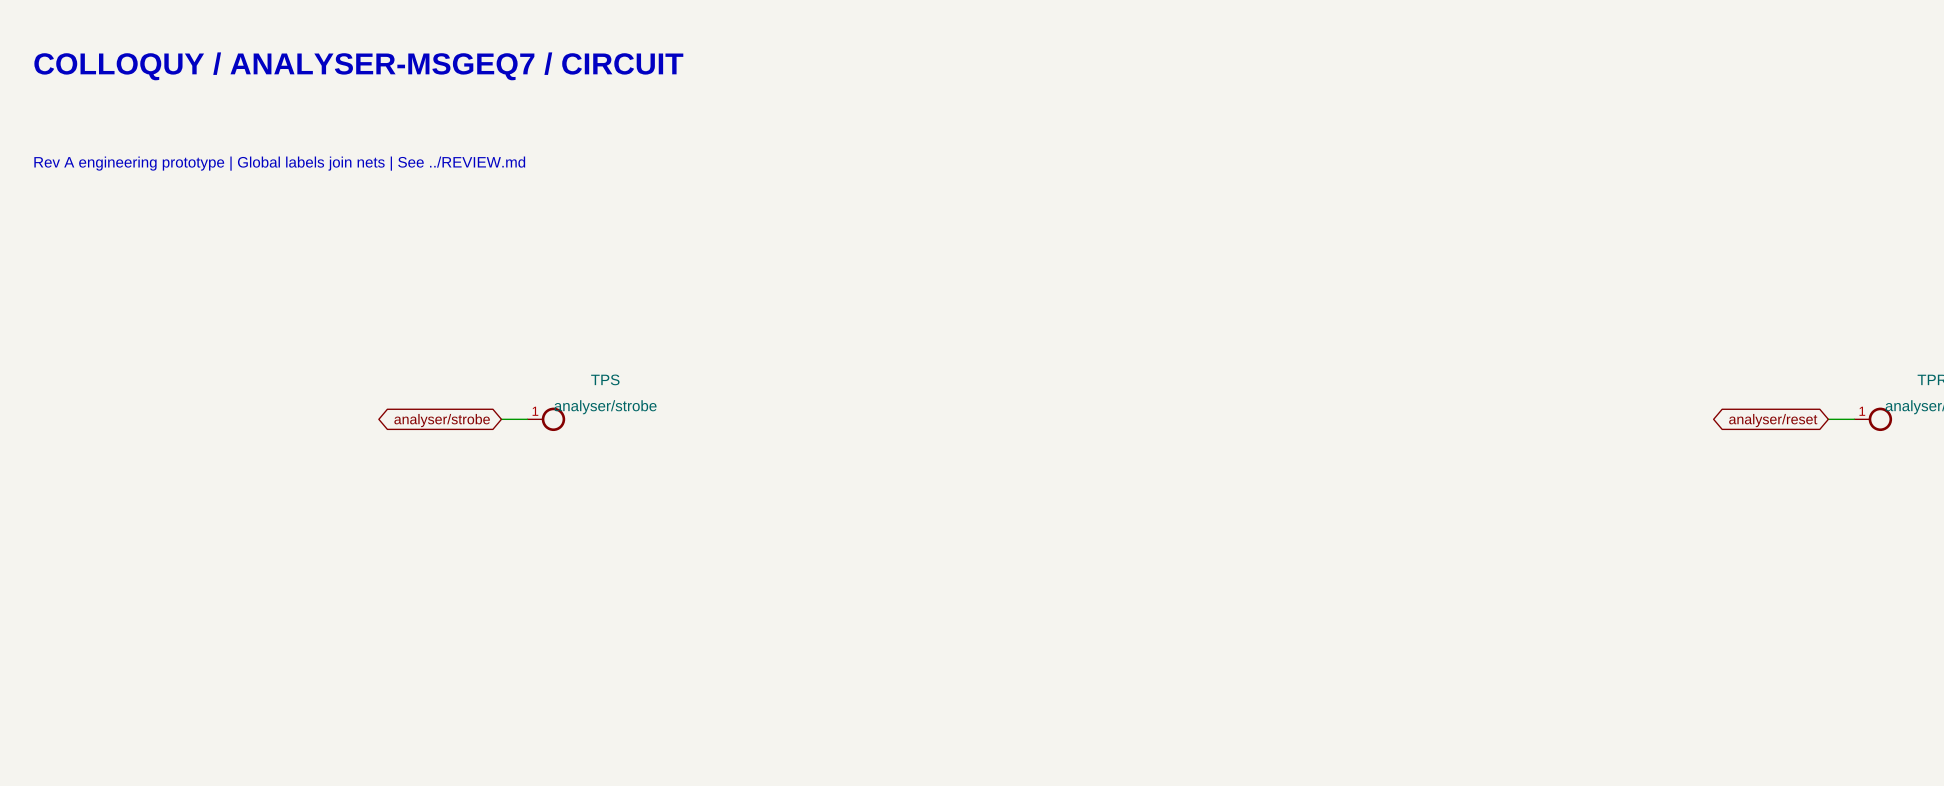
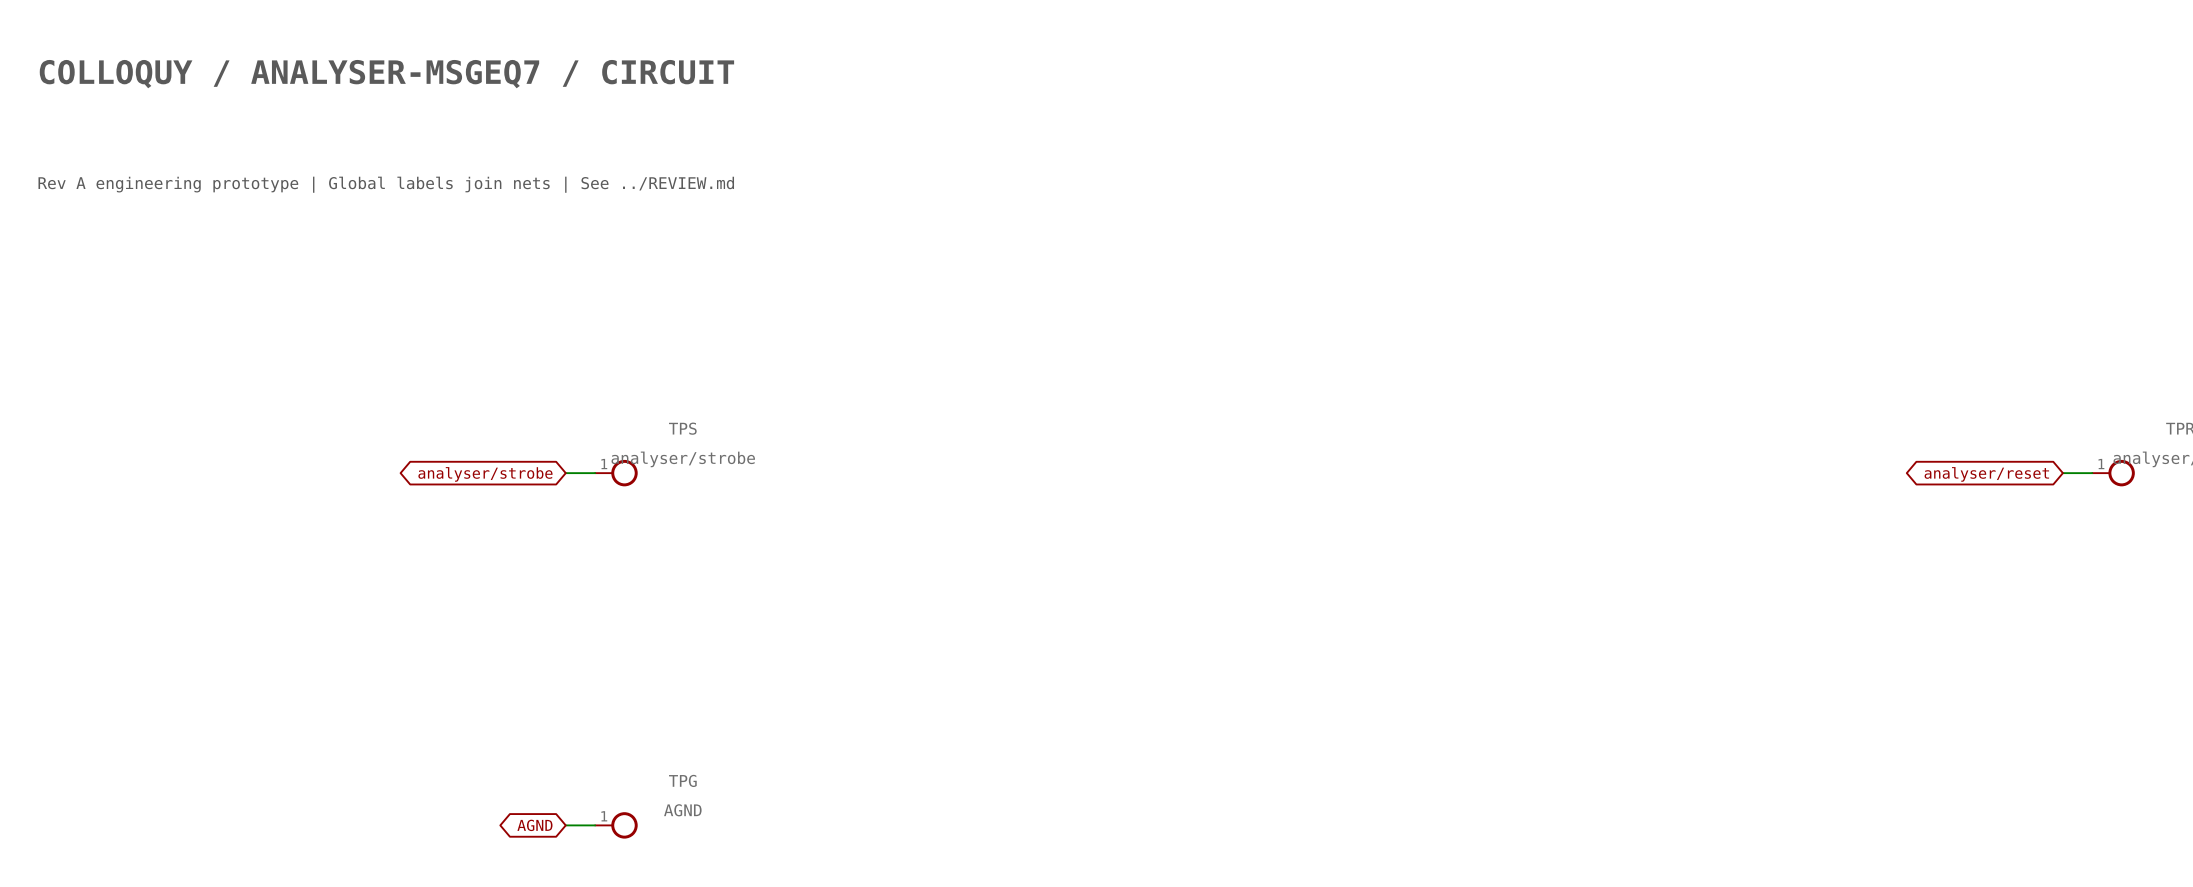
global label: none -> AGND (534, 825)
wire: none -> (565, 825) (595, 825)
TPG: none -> AGND (616, 825)

